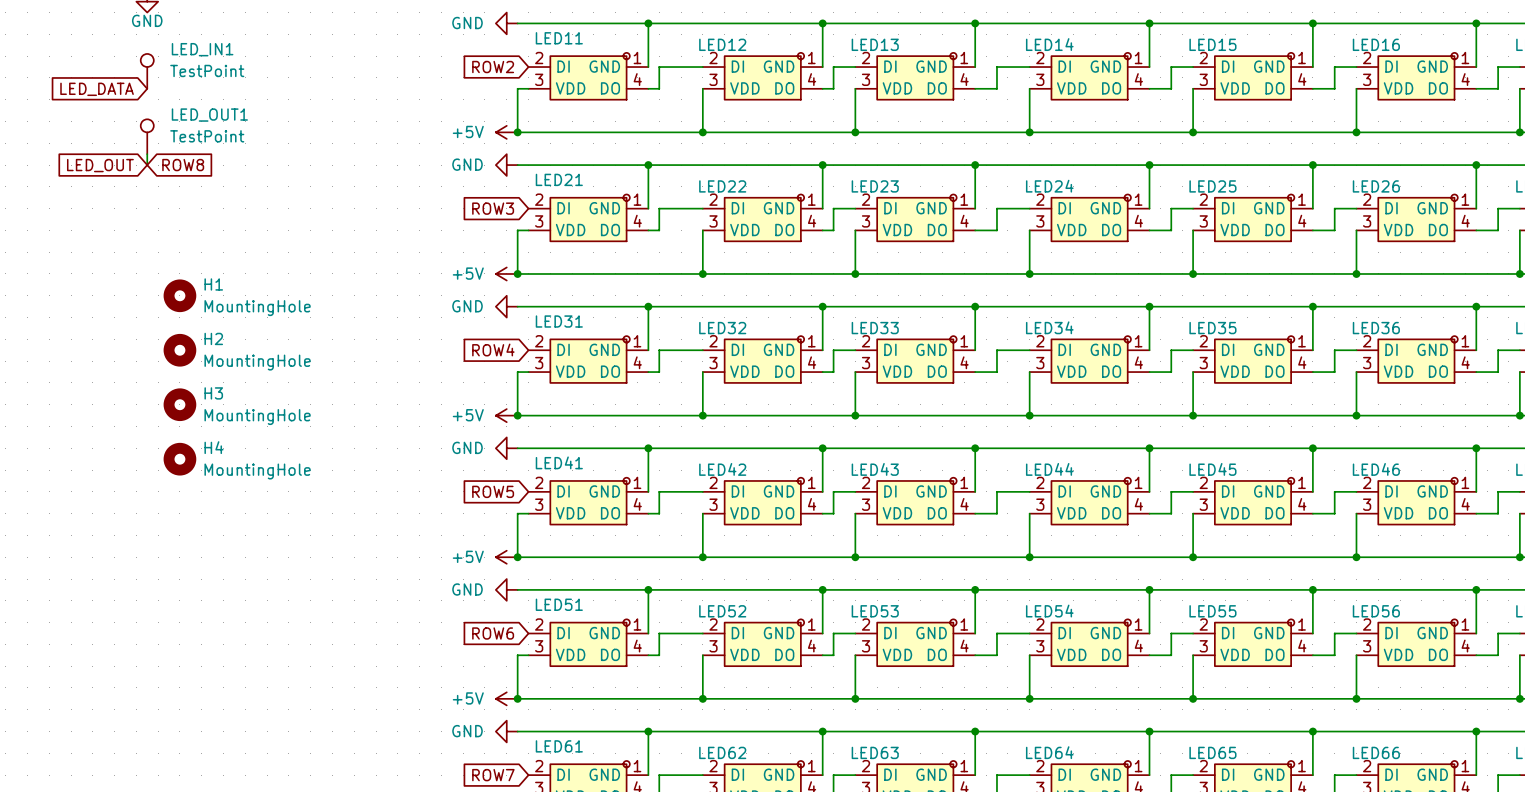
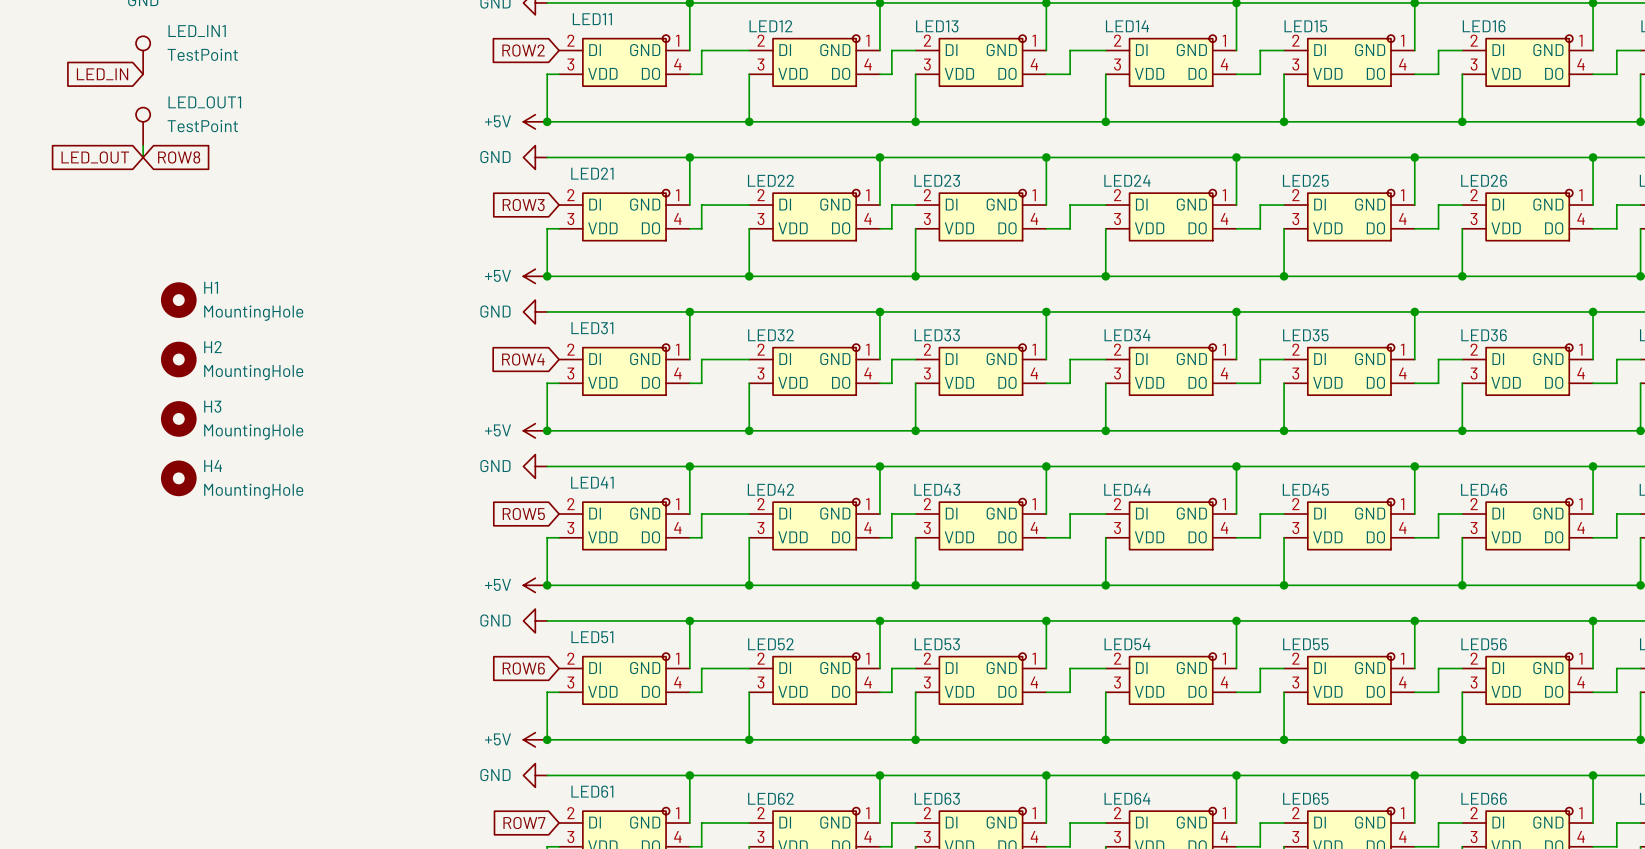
global label: LED_DATA (97, 89) -> LED_IN (102, 74)

